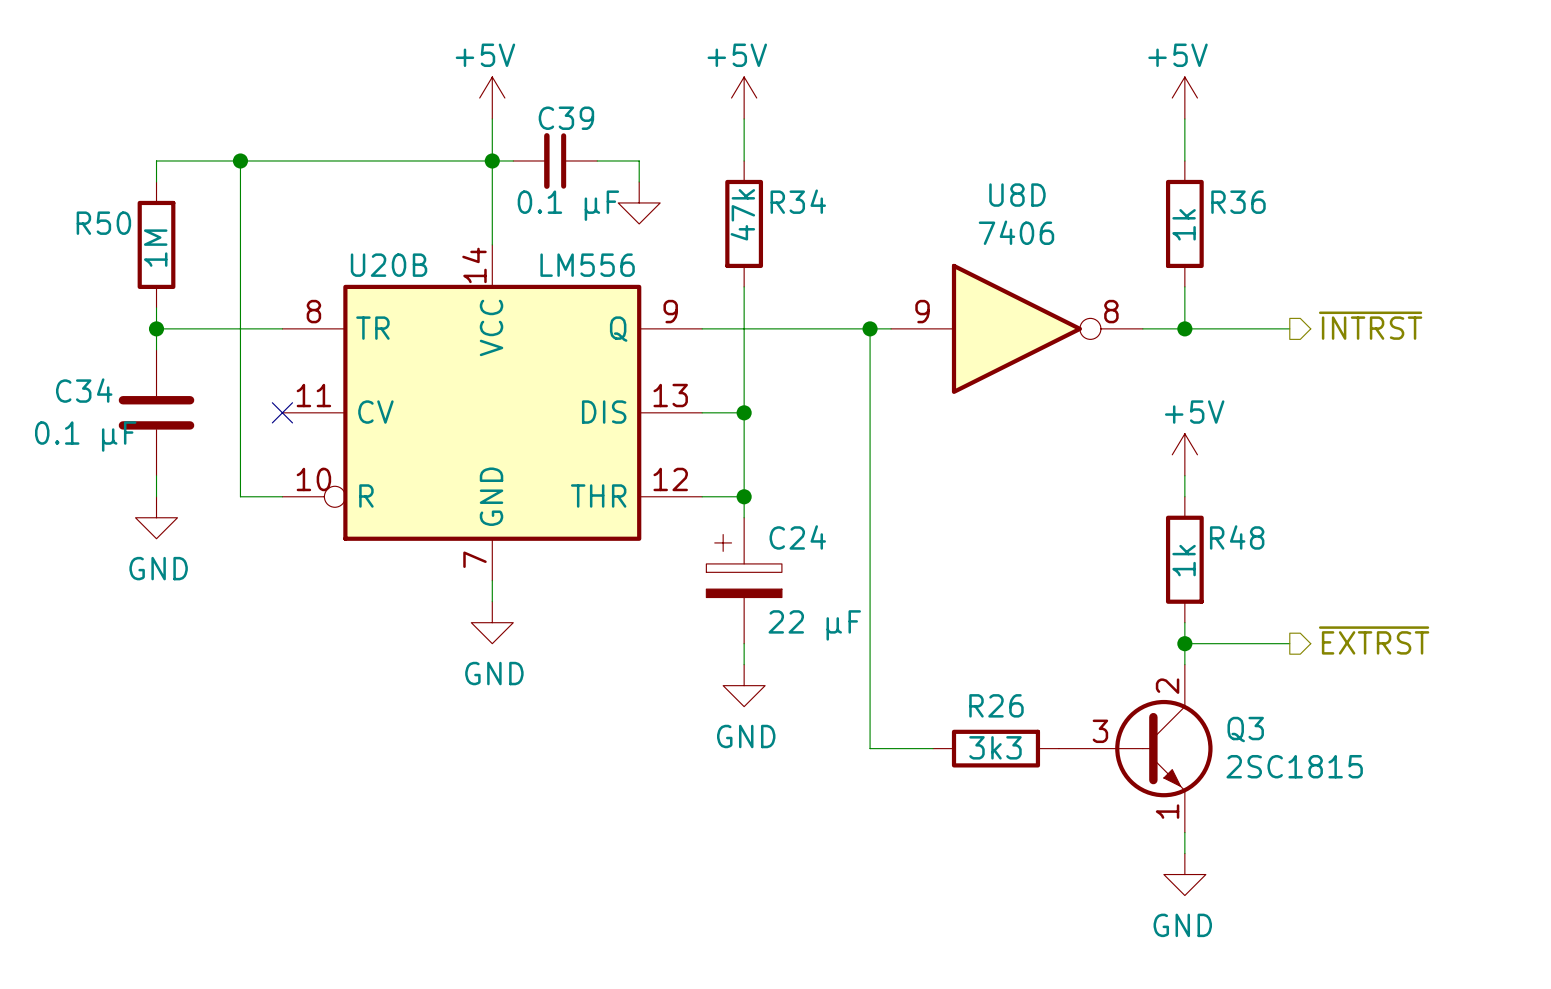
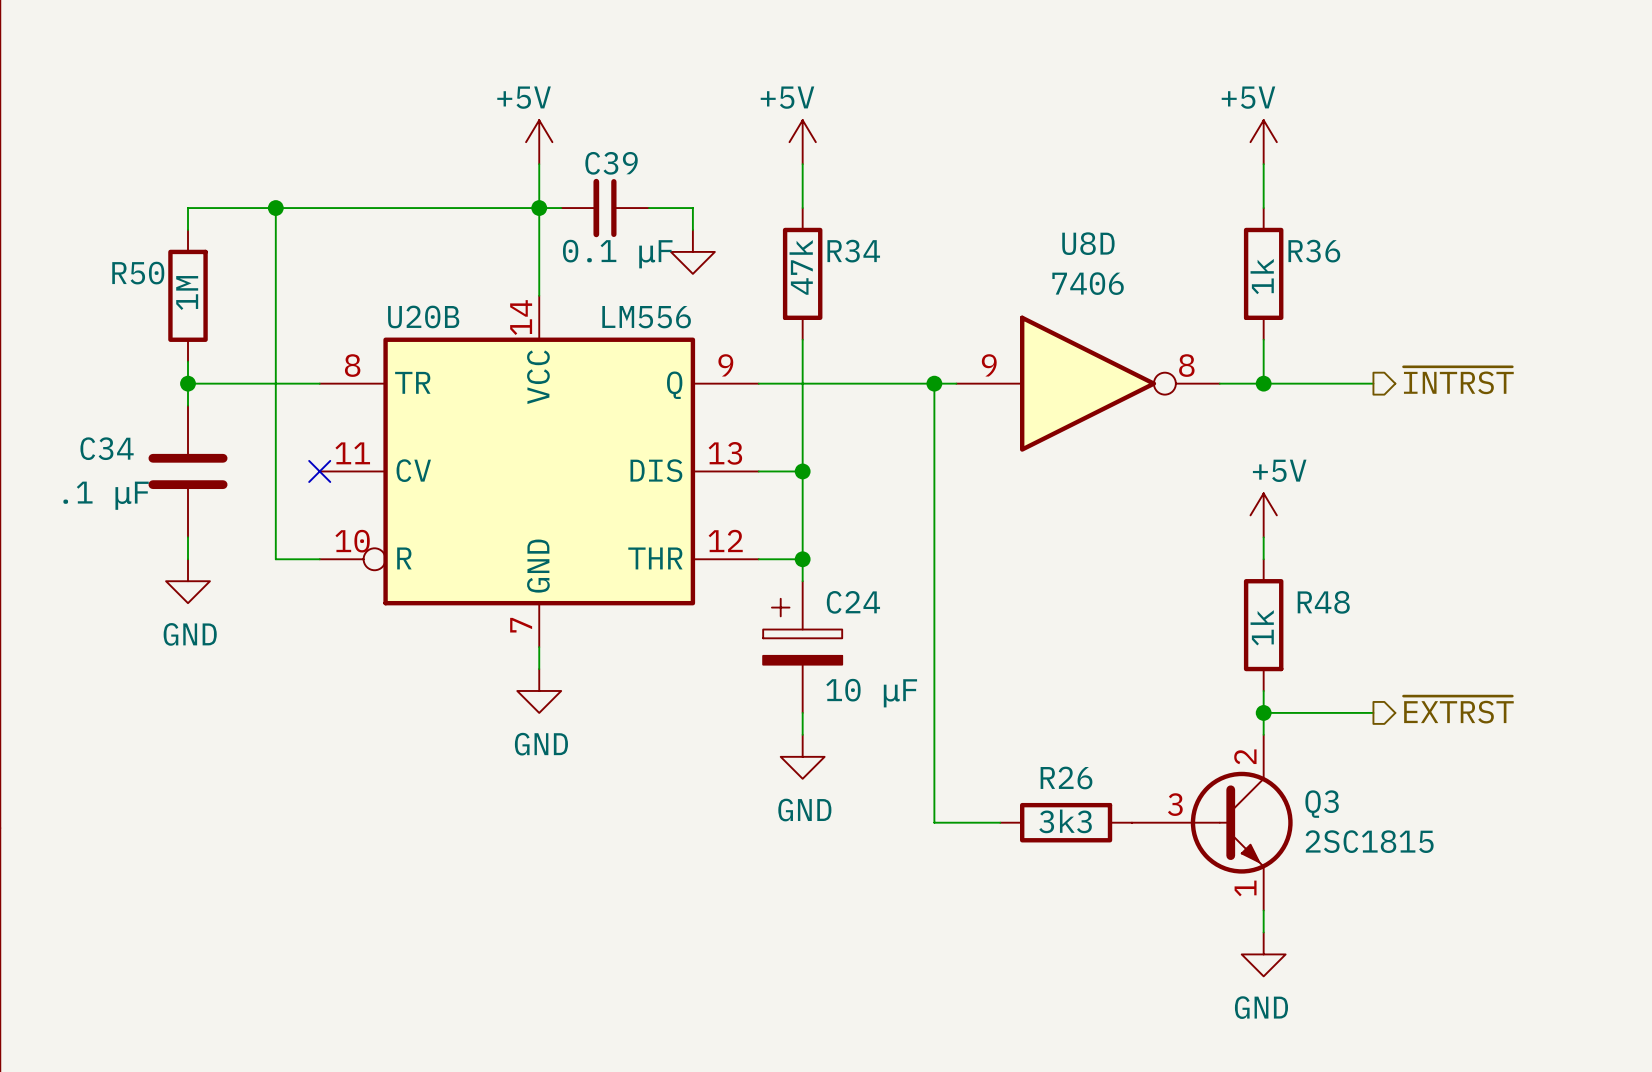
C34 value: 0.1 μF (85, 436) -> .1 μF (106, 495)
C24 value: 22 μF (814, 625) -> 10 μF (871, 693)

